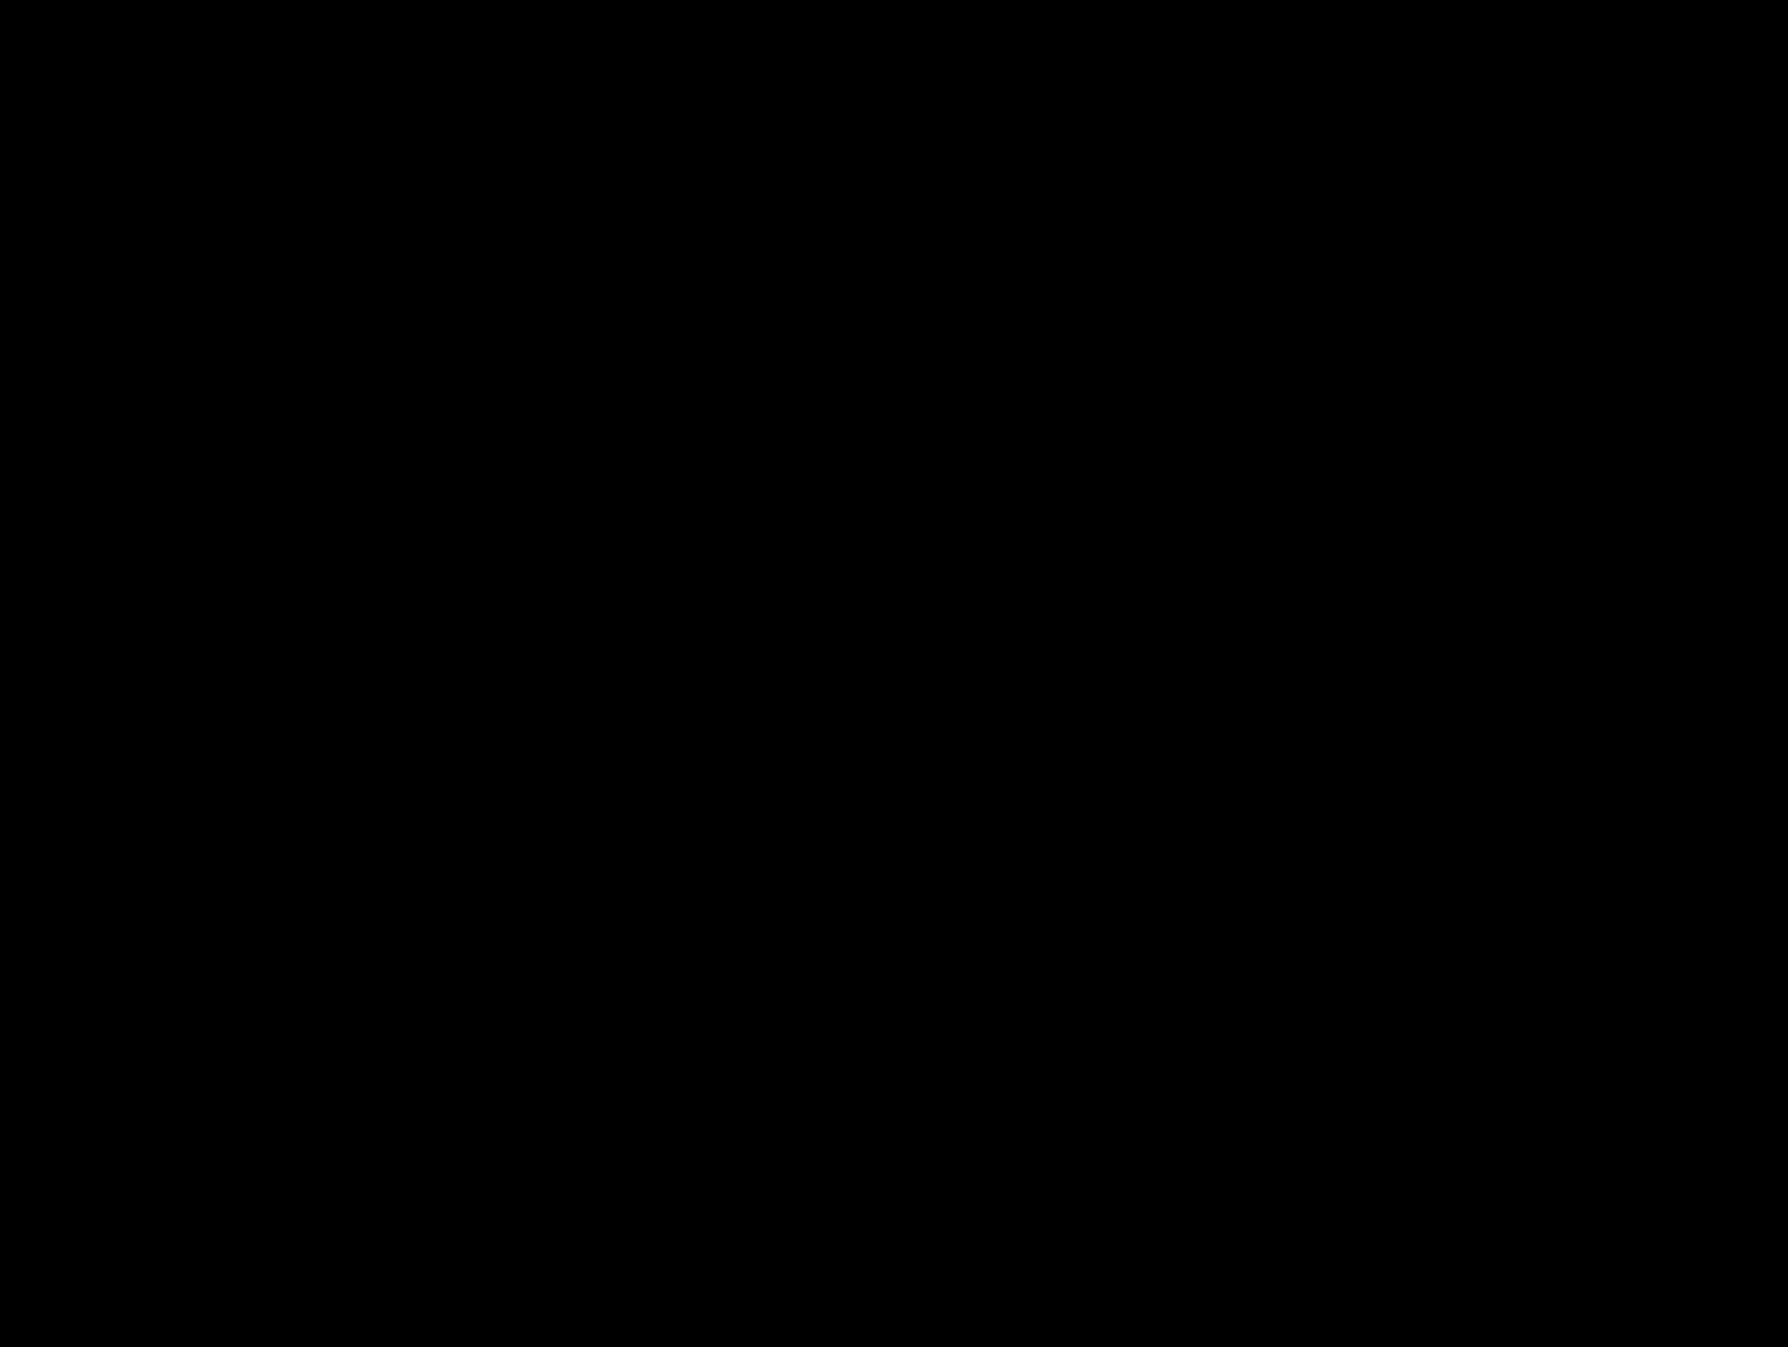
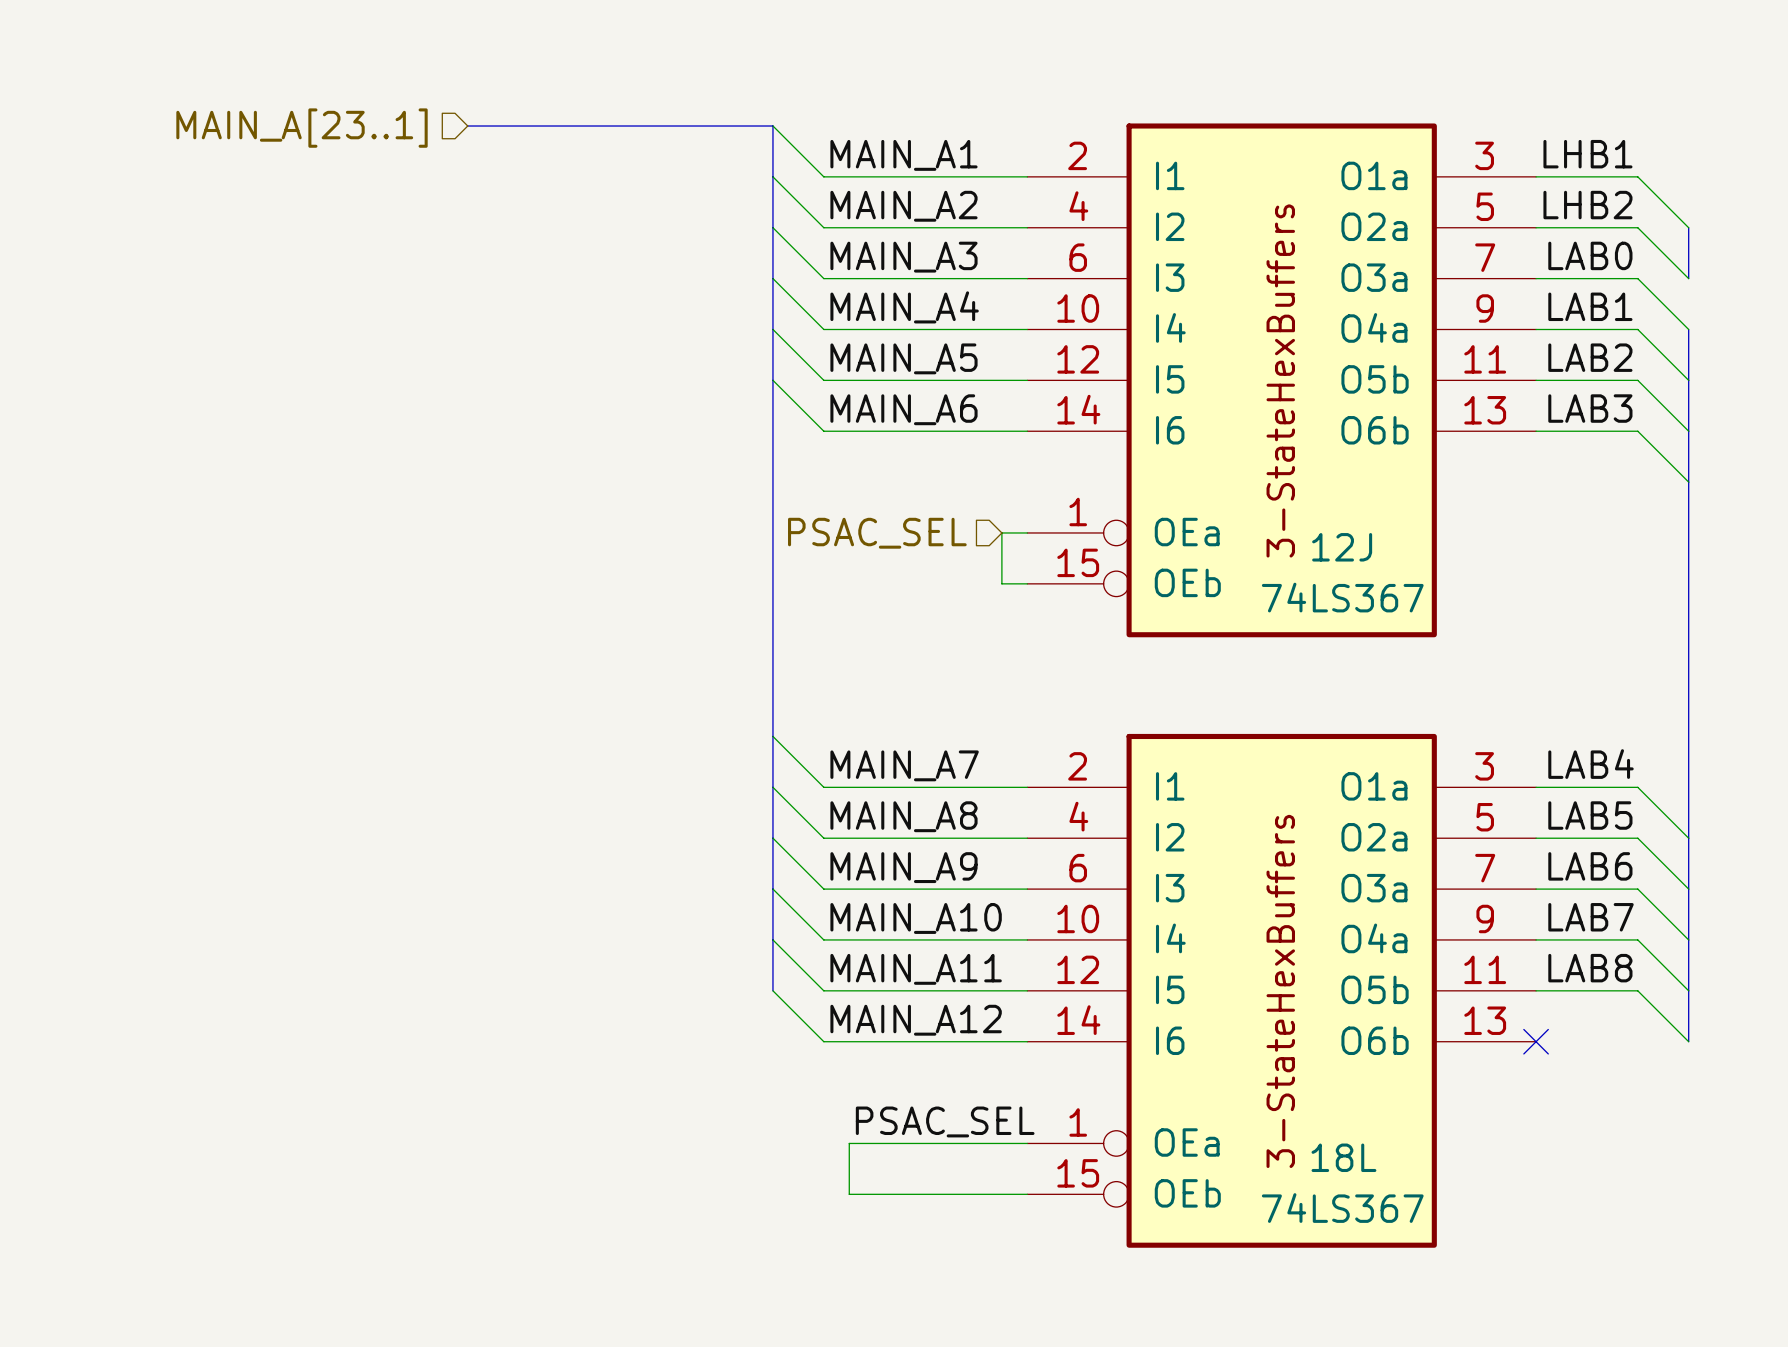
bus: none -> (467, 126) (772, 126) (772, 990)
wire: none -> (772, 126) (823, 176) (1027, 176)
hierarchical label: none -> MAIN_A[23..1] (302, 128)
label: none -> LHB1 (1587, 154)
label: none -> MAIN_A1 (903, 155)
wire: none -> (772, 176) (823, 227) (1027, 227)
wire: none -> (1536, 176) (1637, 176) (1688, 227)
label: none -> LHB2 (1587, 205)
label: none -> MAIN_A2 (903, 206)
wire: none -> (772, 227) (823, 278) (1027, 278)
wire: none -> (1536, 227) (1637, 227) (1688, 278)
bus: none -> (1688, 227) (1688, 278)
label: none -> LAB0 (1590, 255)
label: none -> MAIN_A3 (903, 257)
wire: none -> (772, 278) (823, 329) (1027, 329)
wire: none -> (1536, 278) (1637, 278) (1688, 329)
label: none -> LAB1 (1590, 306)
label: none -> MAIN_A4 (904, 307)
wire: none -> (772, 329) (823, 380) (1027, 380)
wire: none -> (1536, 329) (1637, 329) (1688, 380)
bus: none -> (1688, 329) (1688, 1041)
label: none -> LAB2 (1590, 357)
label: none -> MAIN_A5 (903, 358)
wire: none -> (772, 380) (823, 431) (1027, 431)
12J: none -> 74LS367 (1281, 380)
wire: none -> (1536, 380) (1637, 380) (1688, 431)
label: none -> LAB3 (1590, 408)
label: none -> MAIN_A6 (903, 409)
wire: none -> (1536, 431) (1637, 431) (1688, 482)
wire: none -> (1027, 532) (1001, 532) (1001, 583) (1027, 583)
hierarchical label: none -> PSAC_SEL (877, 533)
wire: none -> (772, 736) (823, 787) (1027, 787)
label: none -> LAB4 (1590, 764)
label: none -> MAIN_A7 (904, 765)
wire: none -> (772, 787) (823, 838) (1027, 838)
wire: none -> (1536, 787) (1637, 787) (1688, 838)
label: none -> LAB5 (1590, 815)
label: none -> MAIN_A8 (903, 816)
wire: none -> (772, 838) (823, 889) (1027, 889)
wire: none -> (1536, 838) (1637, 838) (1688, 889)
label: none -> LAB6 (1590, 866)
label: none -> MAIN_A9 (903, 867)
wire: none -> (772, 889) (823, 939) (1027, 939)
wire: none -> (1536, 889) (1637, 889) (1688, 939)
label: none -> LAB7 (1590, 917)
label: none -> MAIN_A10 (916, 918)
wire: none -> (772, 939) (823, 990) (1027, 990)
wire: none -> (1536, 939) (1637, 939) (1688, 990)
label: none -> LAB8 (1590, 968)
label: none -> MAIN_A11 (916, 969)
wire: none -> (772, 990) (823, 1041) (1027, 1041)
18L: none -> 74LS367 (1281, 990)
wire: none -> (1536, 990) (1637, 990) (1688, 1041)
label: none -> MAIN_A12 (916, 1020)
no-connect mark: none -> (1536, 1041)
label: none -> PSAC_SEL (945, 1121)
wire: none -> (1027, 1143) (849, 1143) (849, 1194) (1027, 1194)

